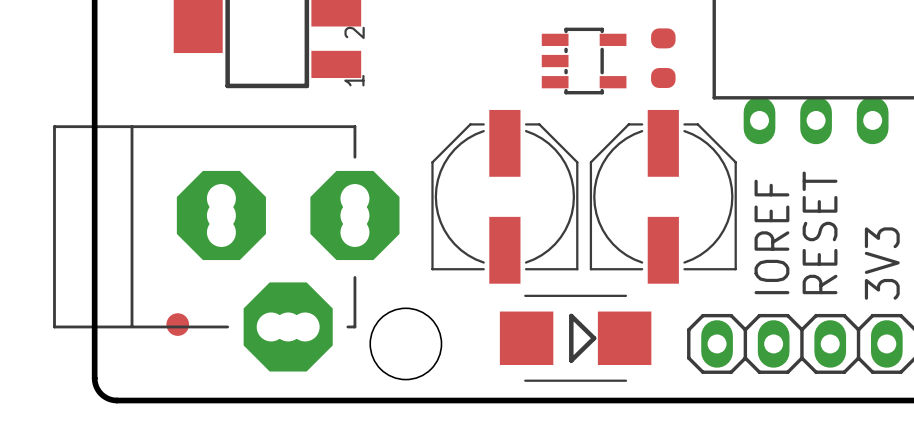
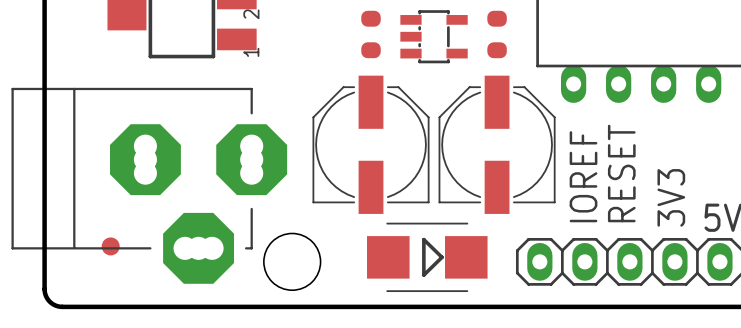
part: none -> (371, 34)

